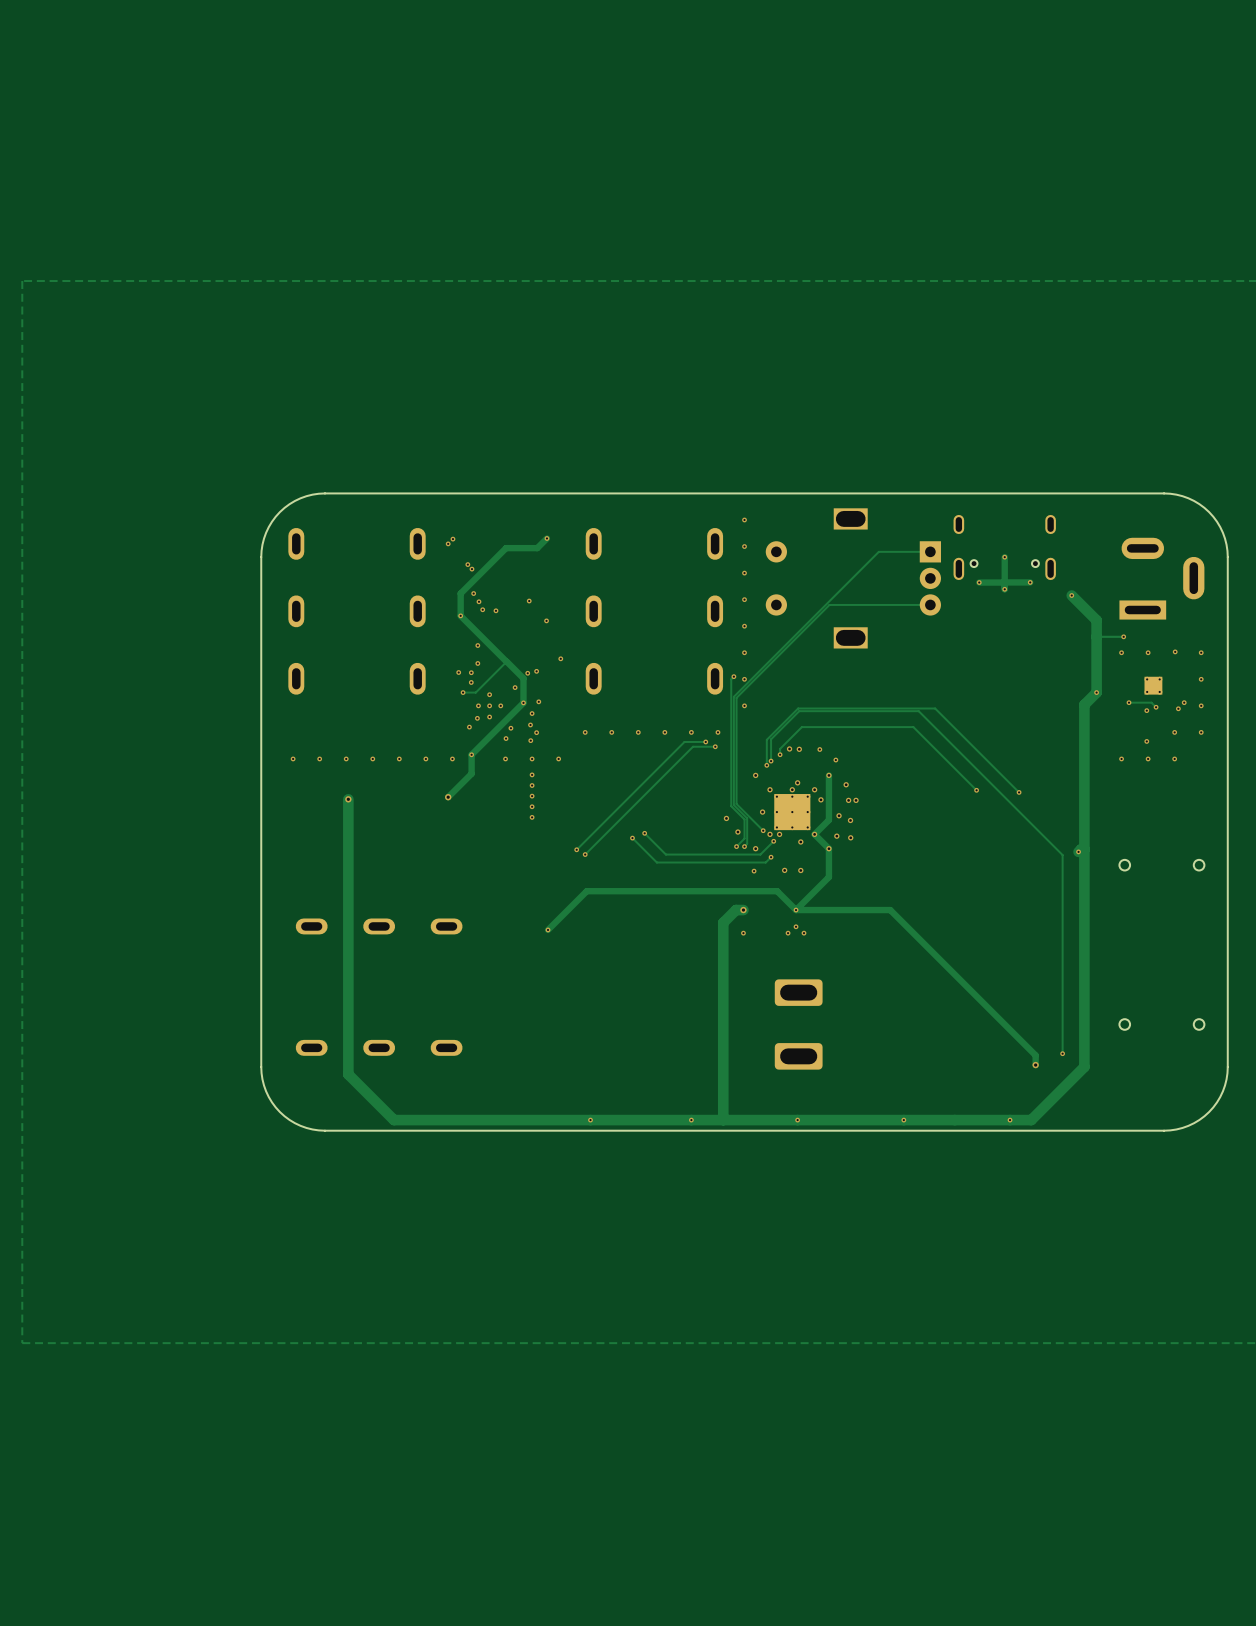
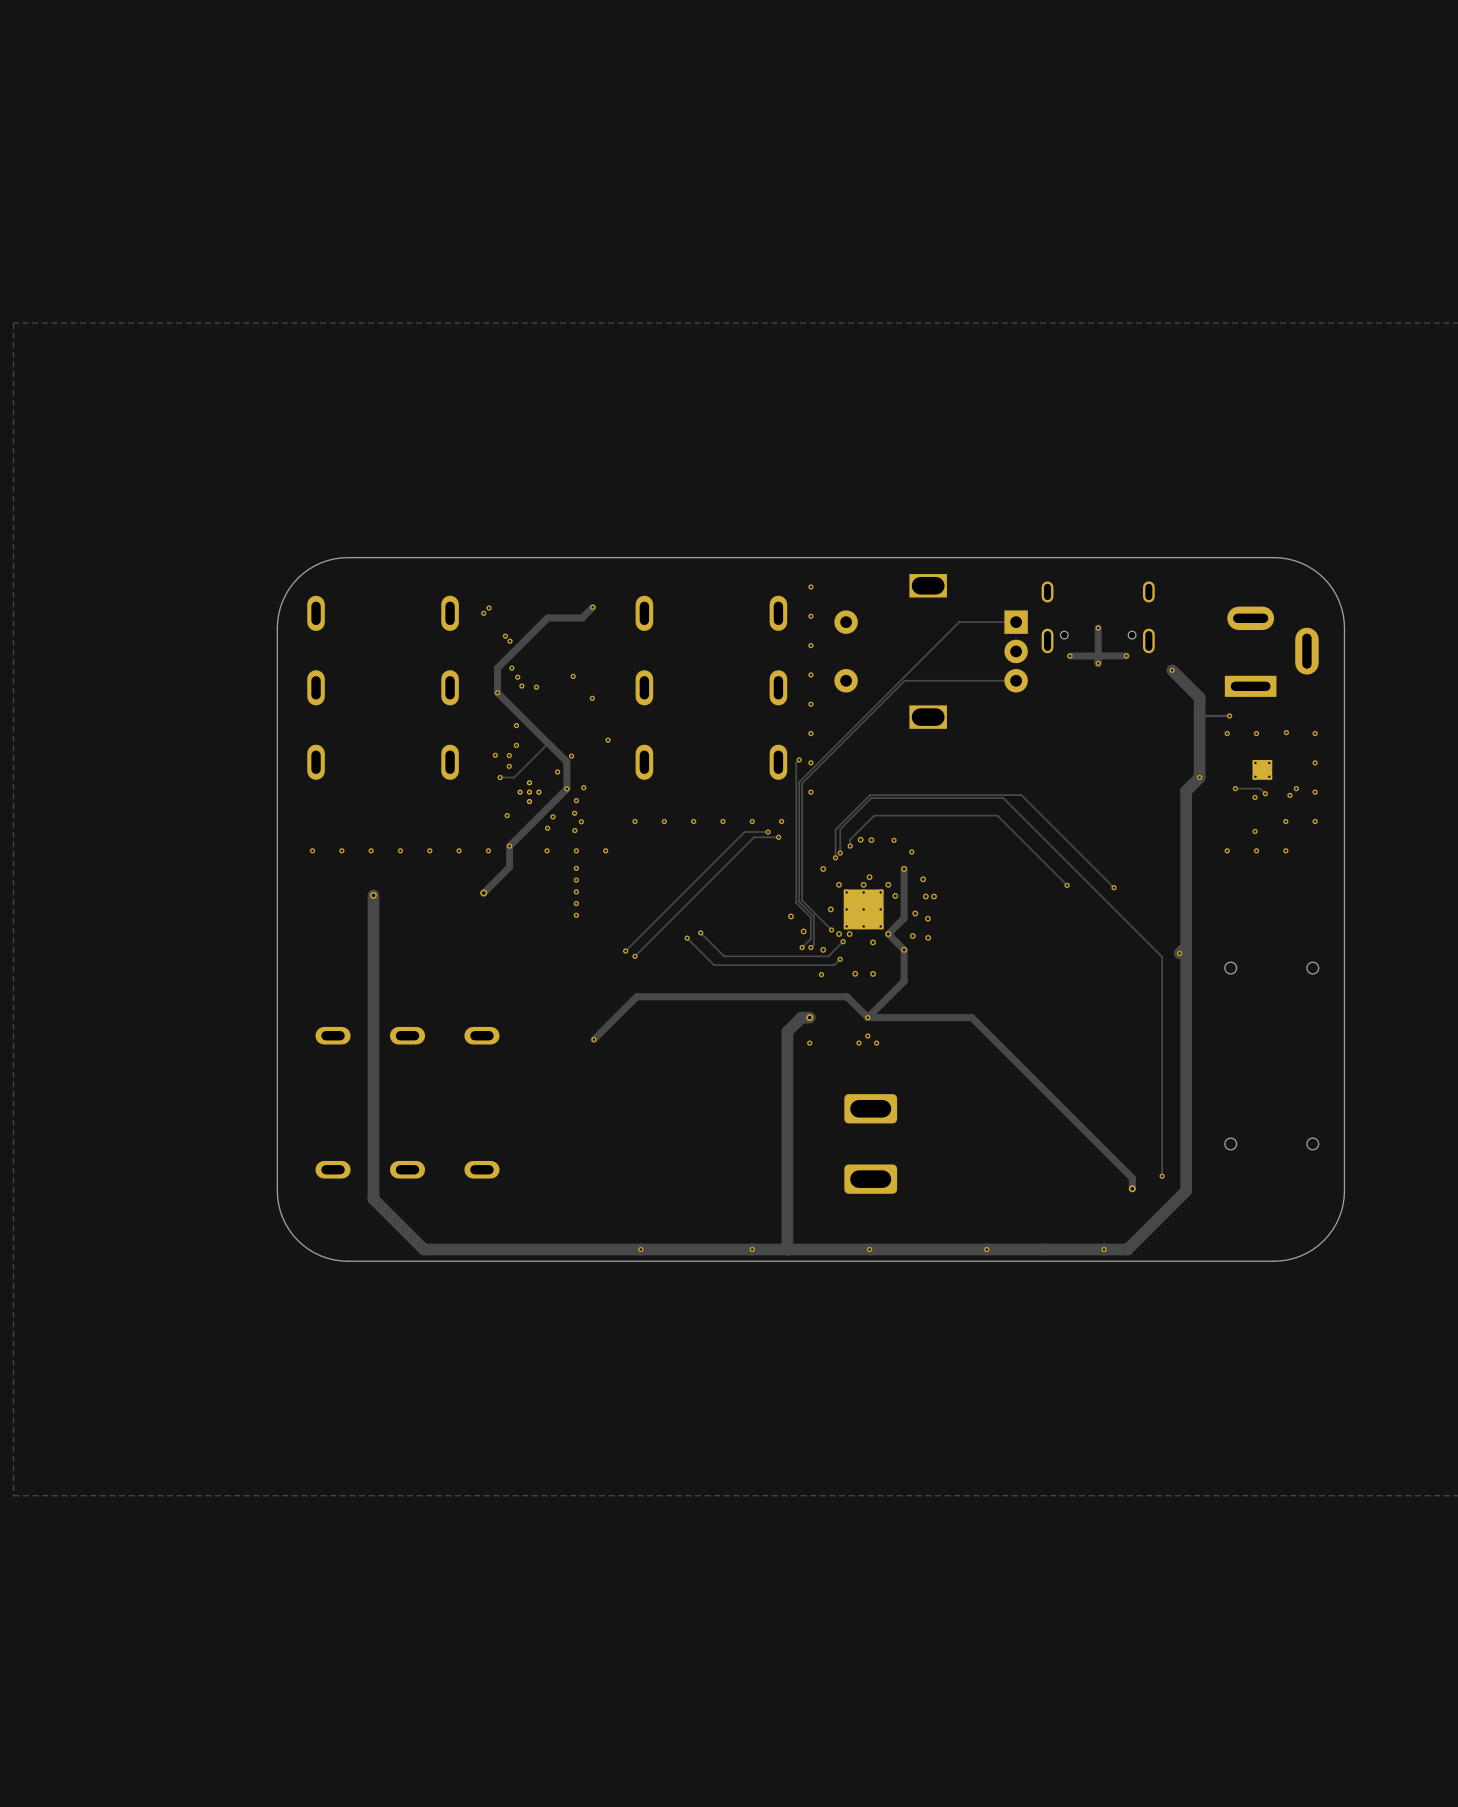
via: (536, 671) -> none
via: (489, 694) -> none
via: (478, 705) -> none
part: none -> (529, 792)
via: (500, 705) -> none
via: (489, 717) -> none
via: (477, 718) -> none

